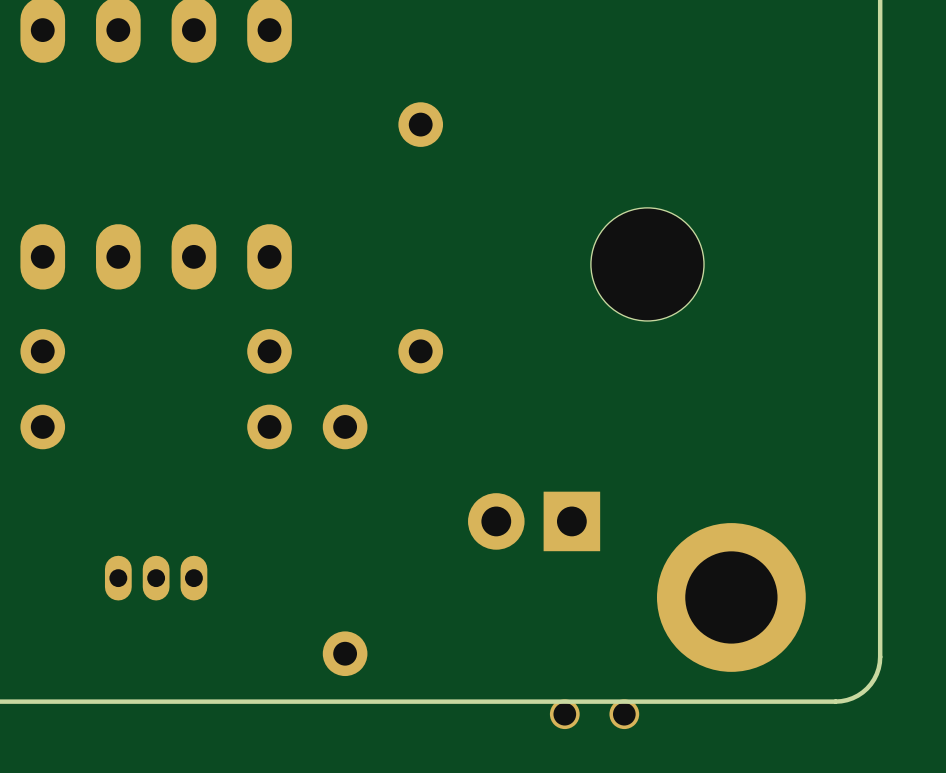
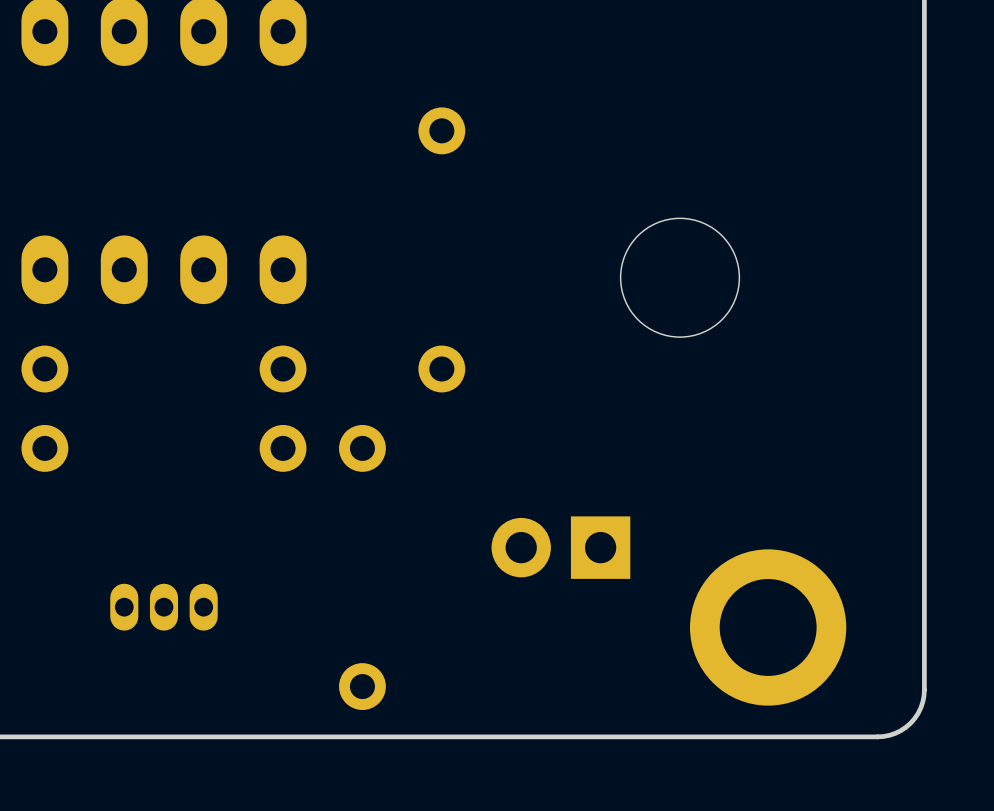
part: (594, 714) -> none

